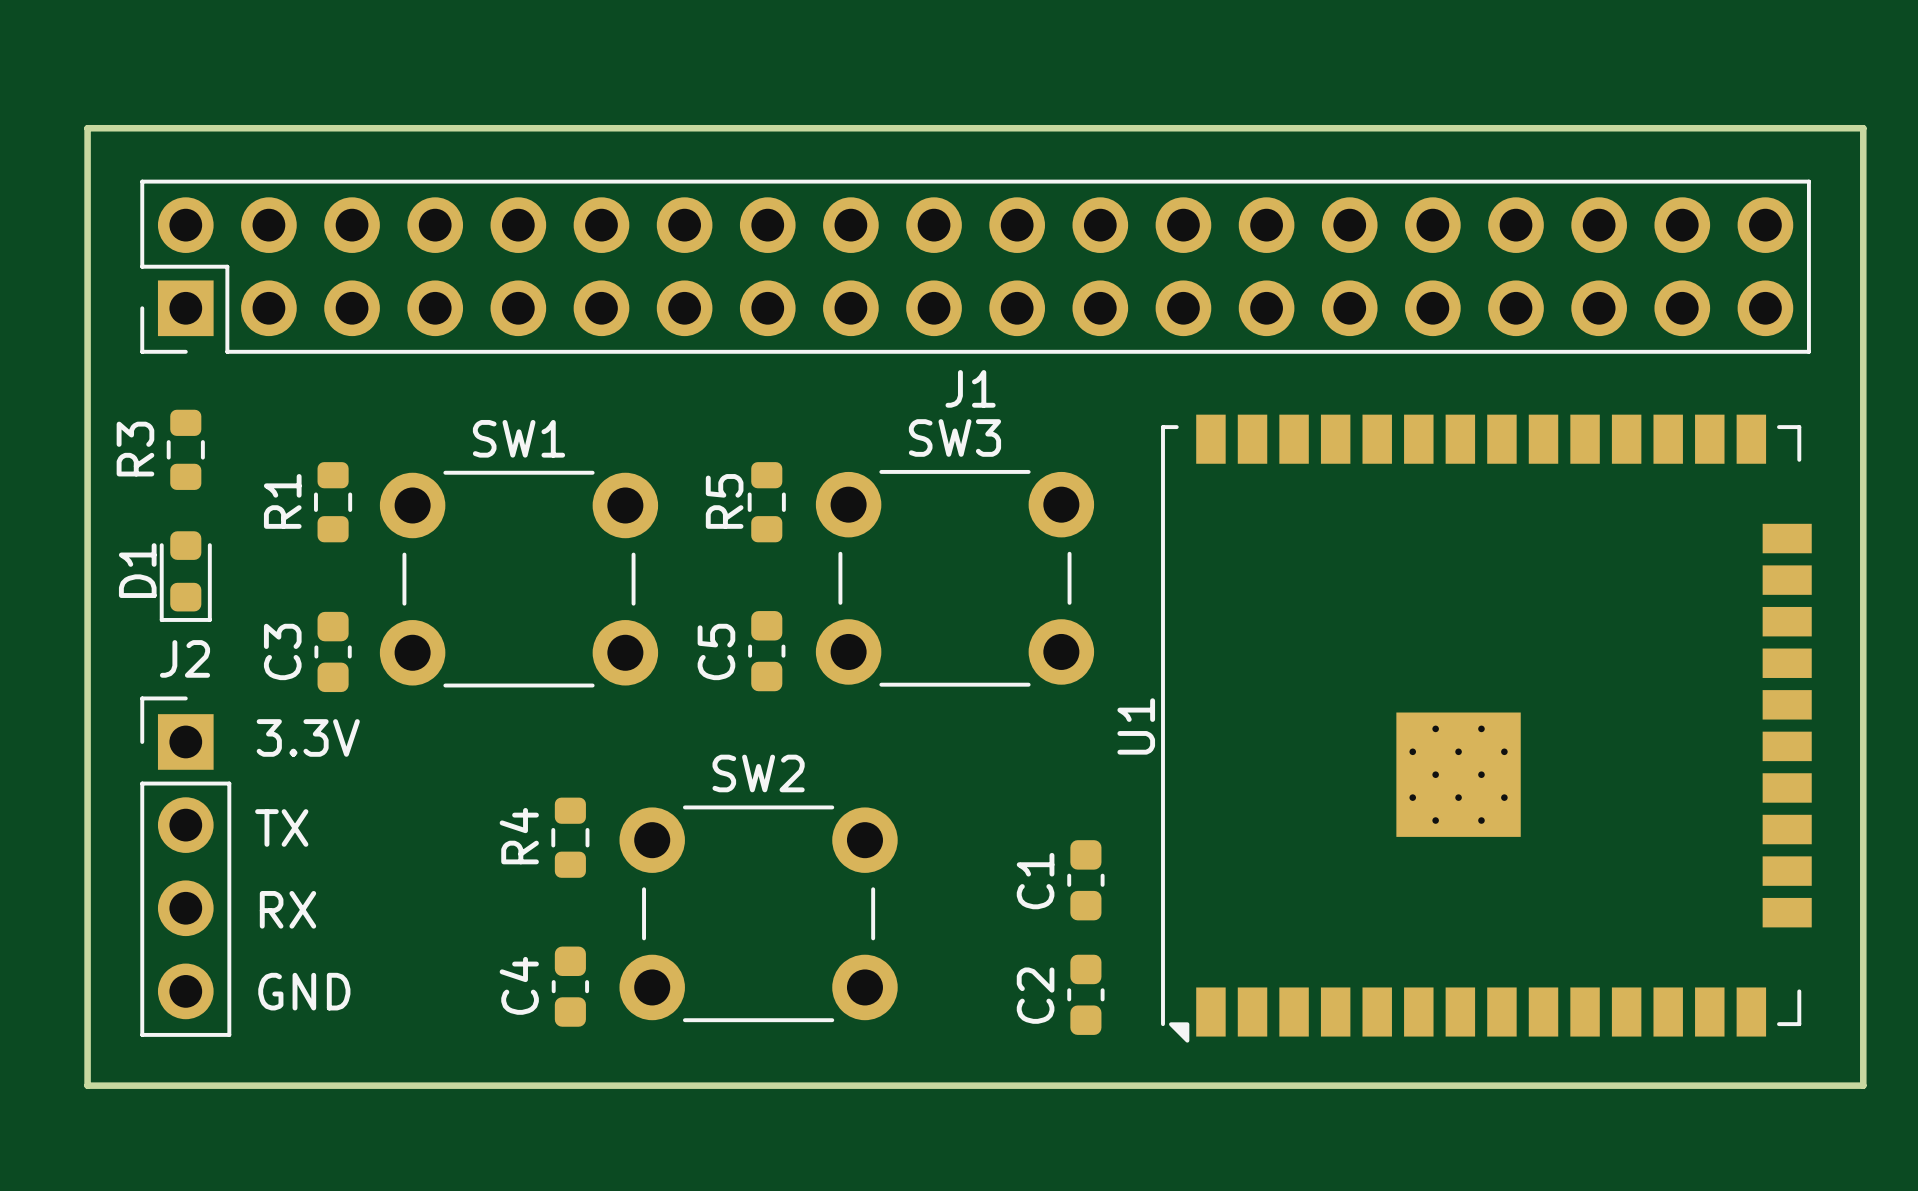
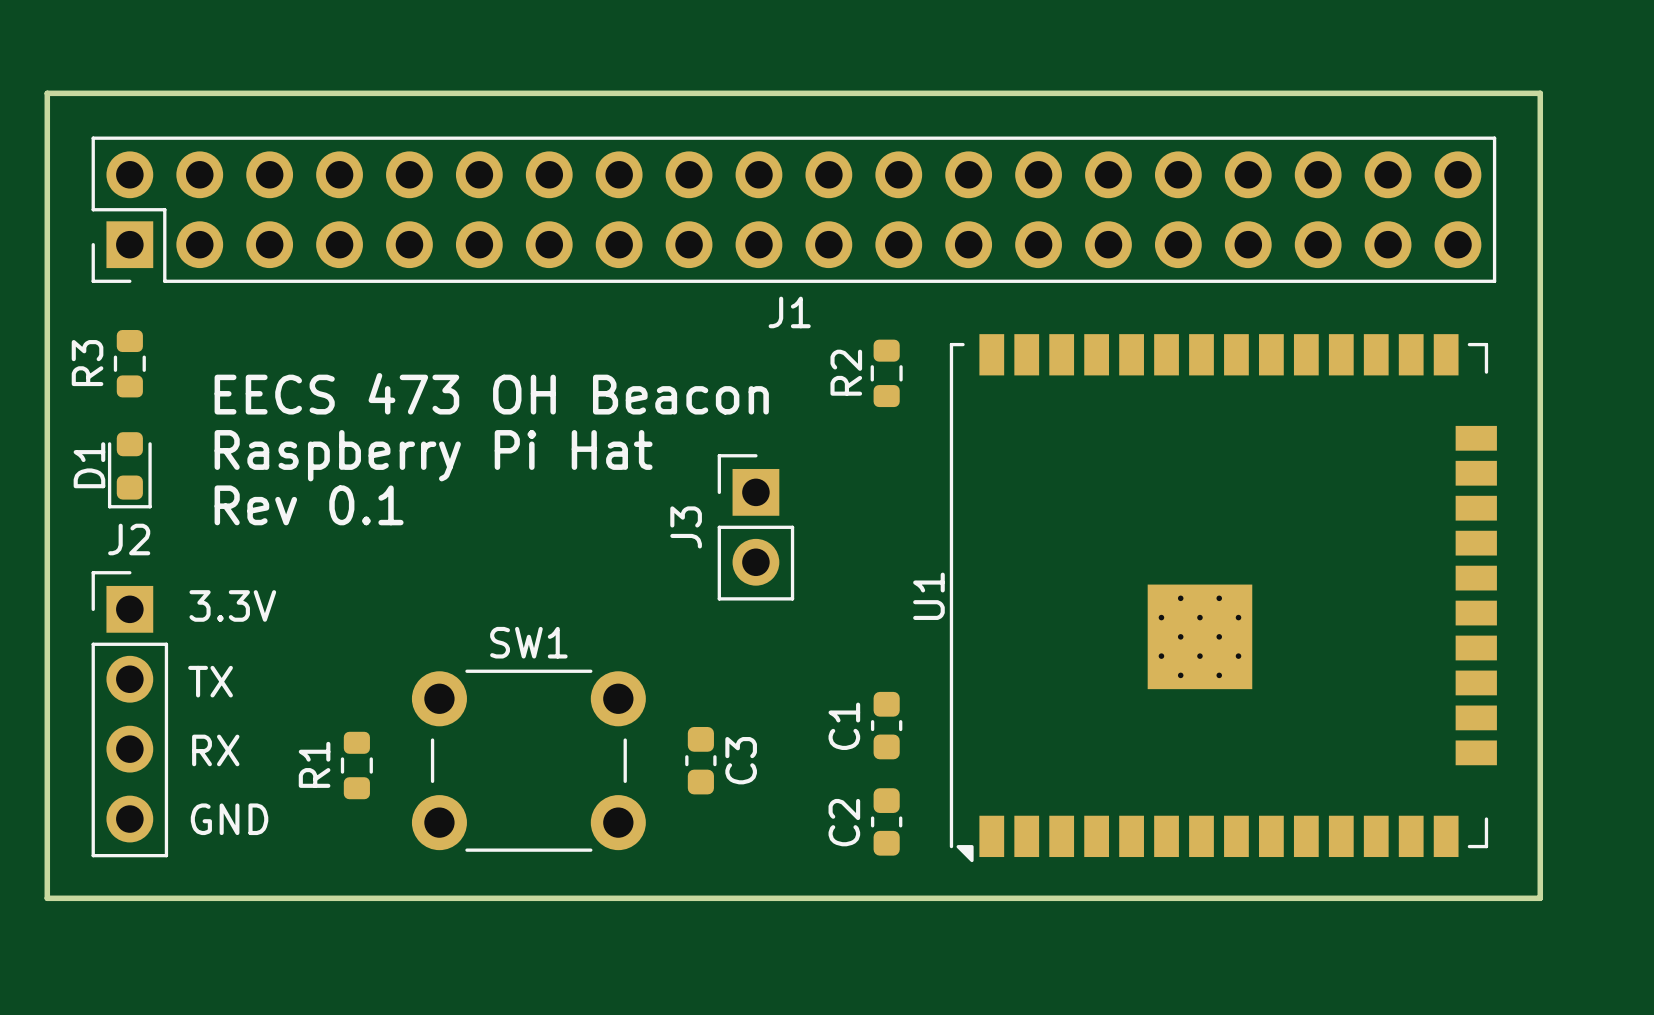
R2: none -> (886, 373)
text: none -> EECS 473 OH Beacon (491, 393)
R1 position: (333, 502) -> (356, 765)
R5: (766, 502) -> none
text: none -> Raspberry Pi Hat (433, 455)
SW3: (954, 578) -> none
SW1 position: (518, 579) -> (528, 760)
text: none -> Rev 0.1 (309, 505)
J3: none -> (755, 527)
C3 name position: C3 (282, 651) -> C3 (741, 760)
C3 position: (333, 651) -> (700, 760)
C5: (766, 651) -> none
R4: (570, 837) -> none
SW2: (758, 913) -> none
C4: (570, 986) -> none

